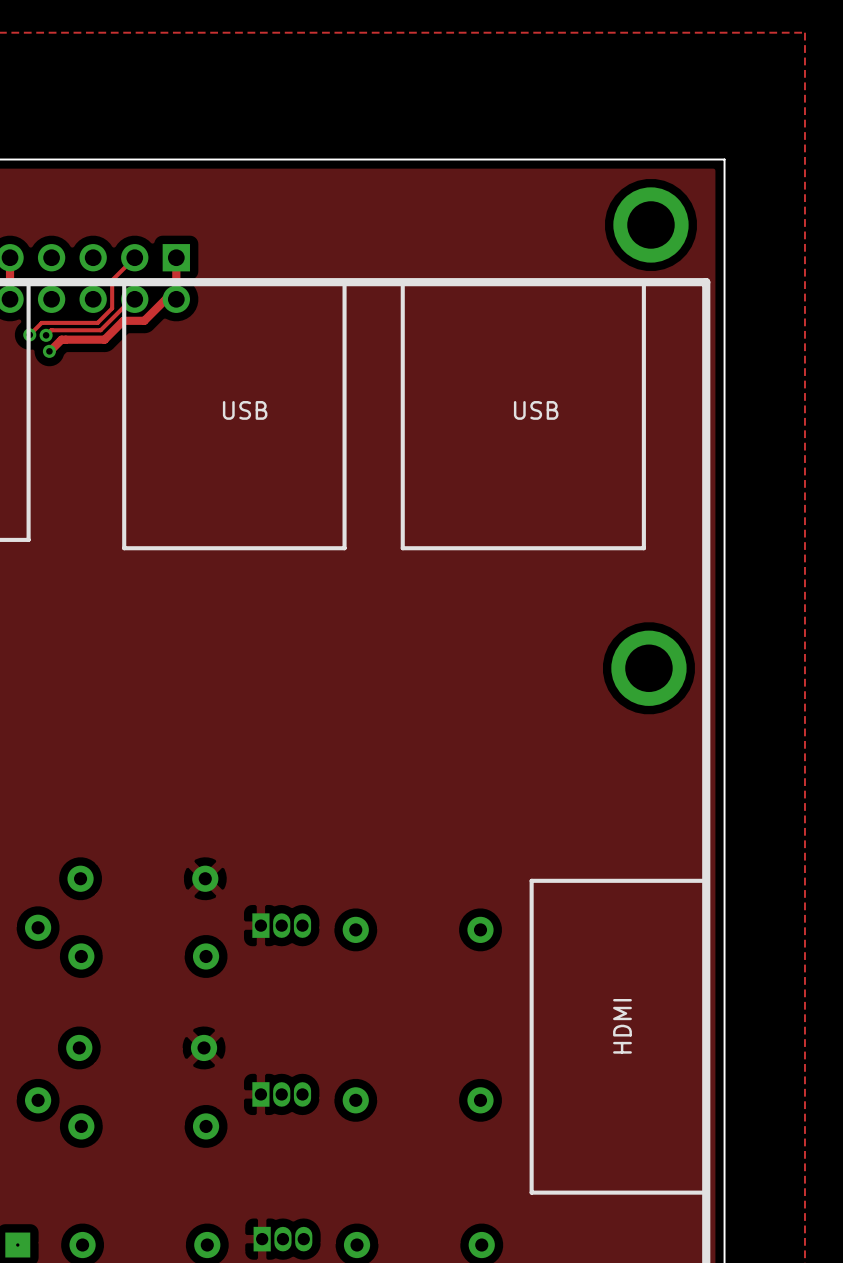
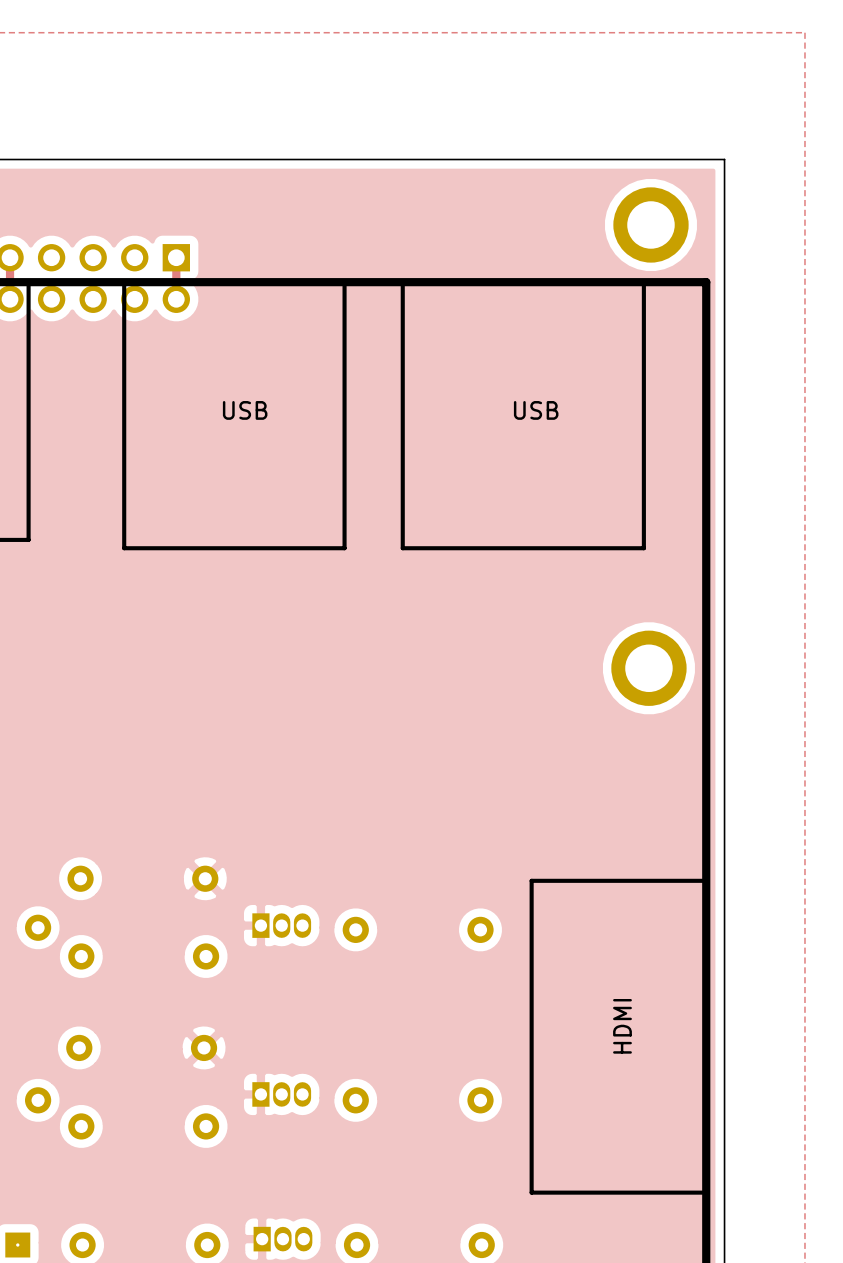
track: (134, 257) (112, 280) (112, 308) (97, 322) (41, 322) (29, 334) -> none
track: (134, 299) (131, 299) (100, 330) (51, 330) (46, 335) -> none
track: (176, 299) (165, 299) (144, 320) (123, 320) (104, 339) (61, 339) (49, 351) -> none
via: (29, 334) -> none
via: (46, 335) -> none
via: (49, 351) -> none

